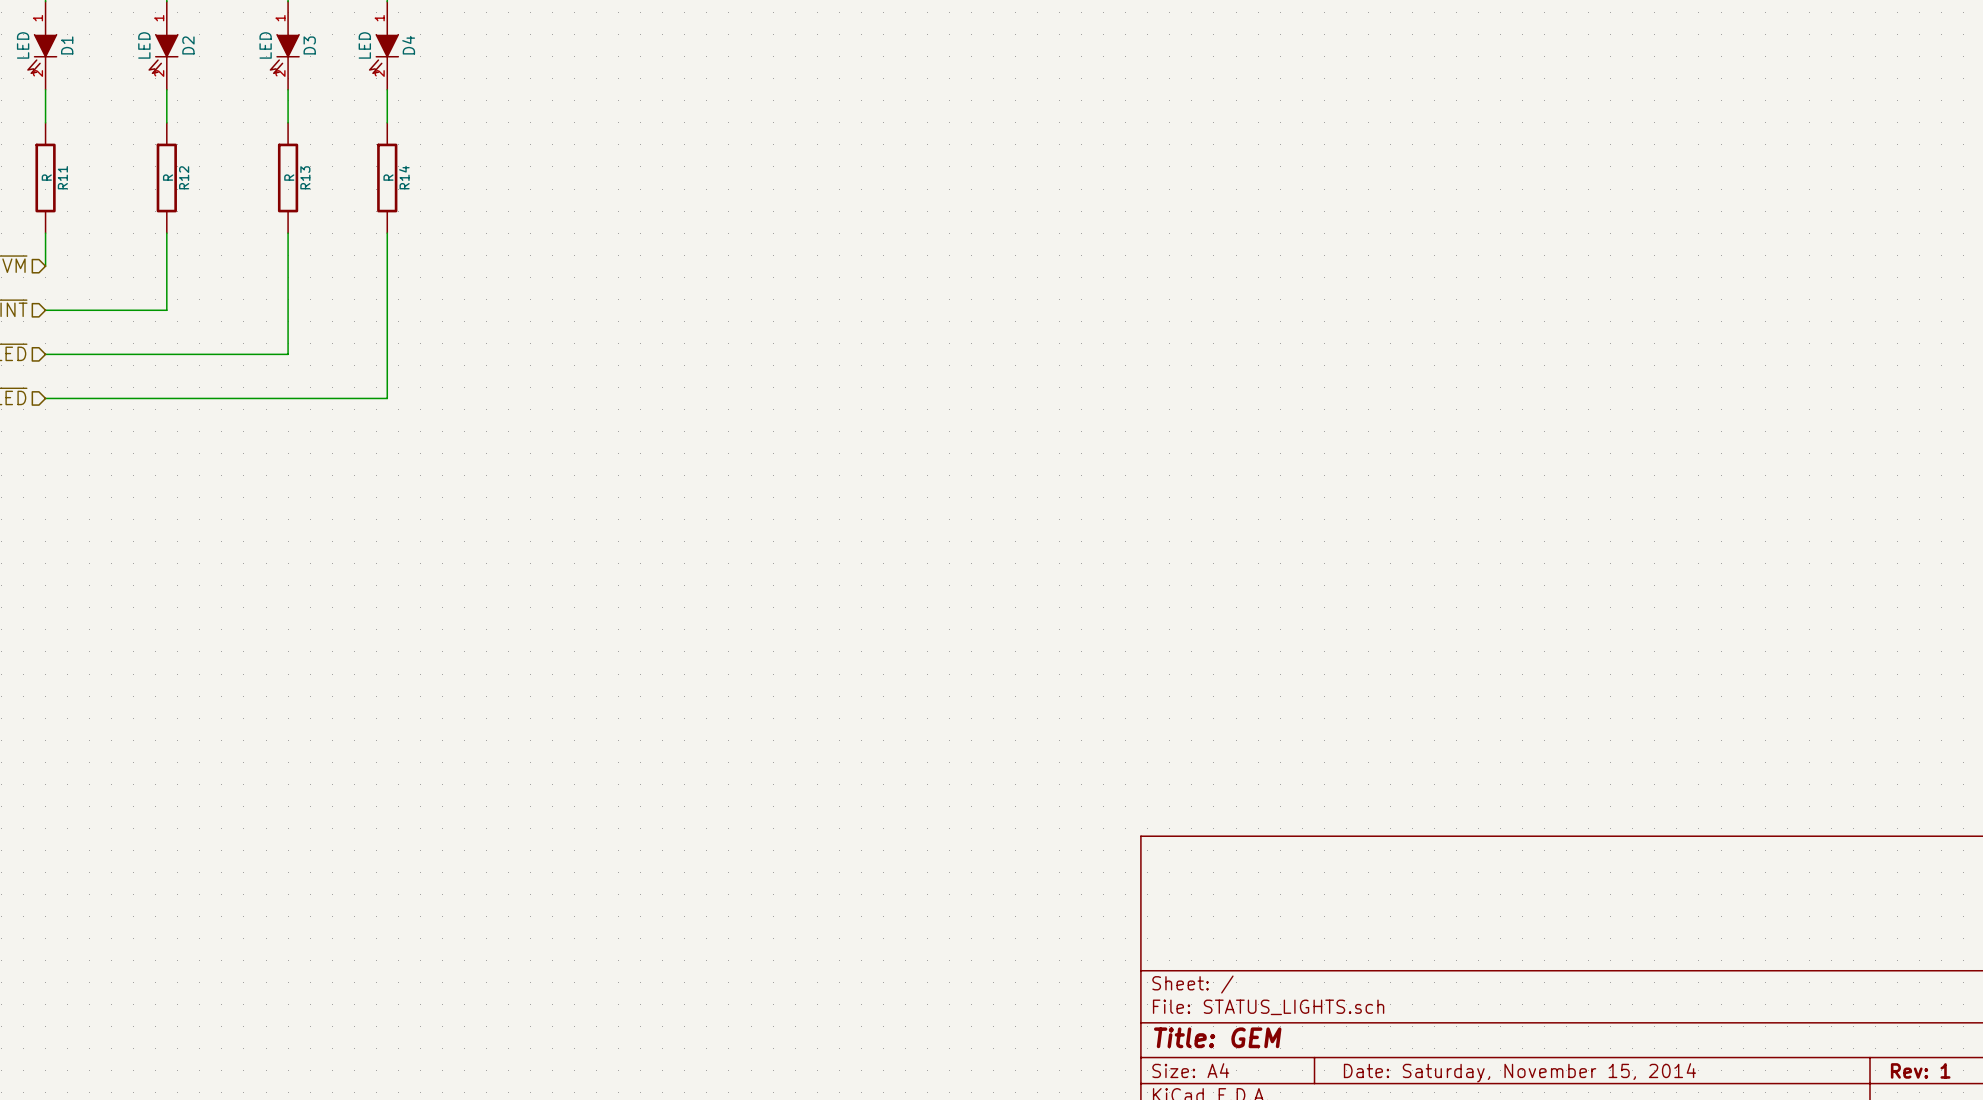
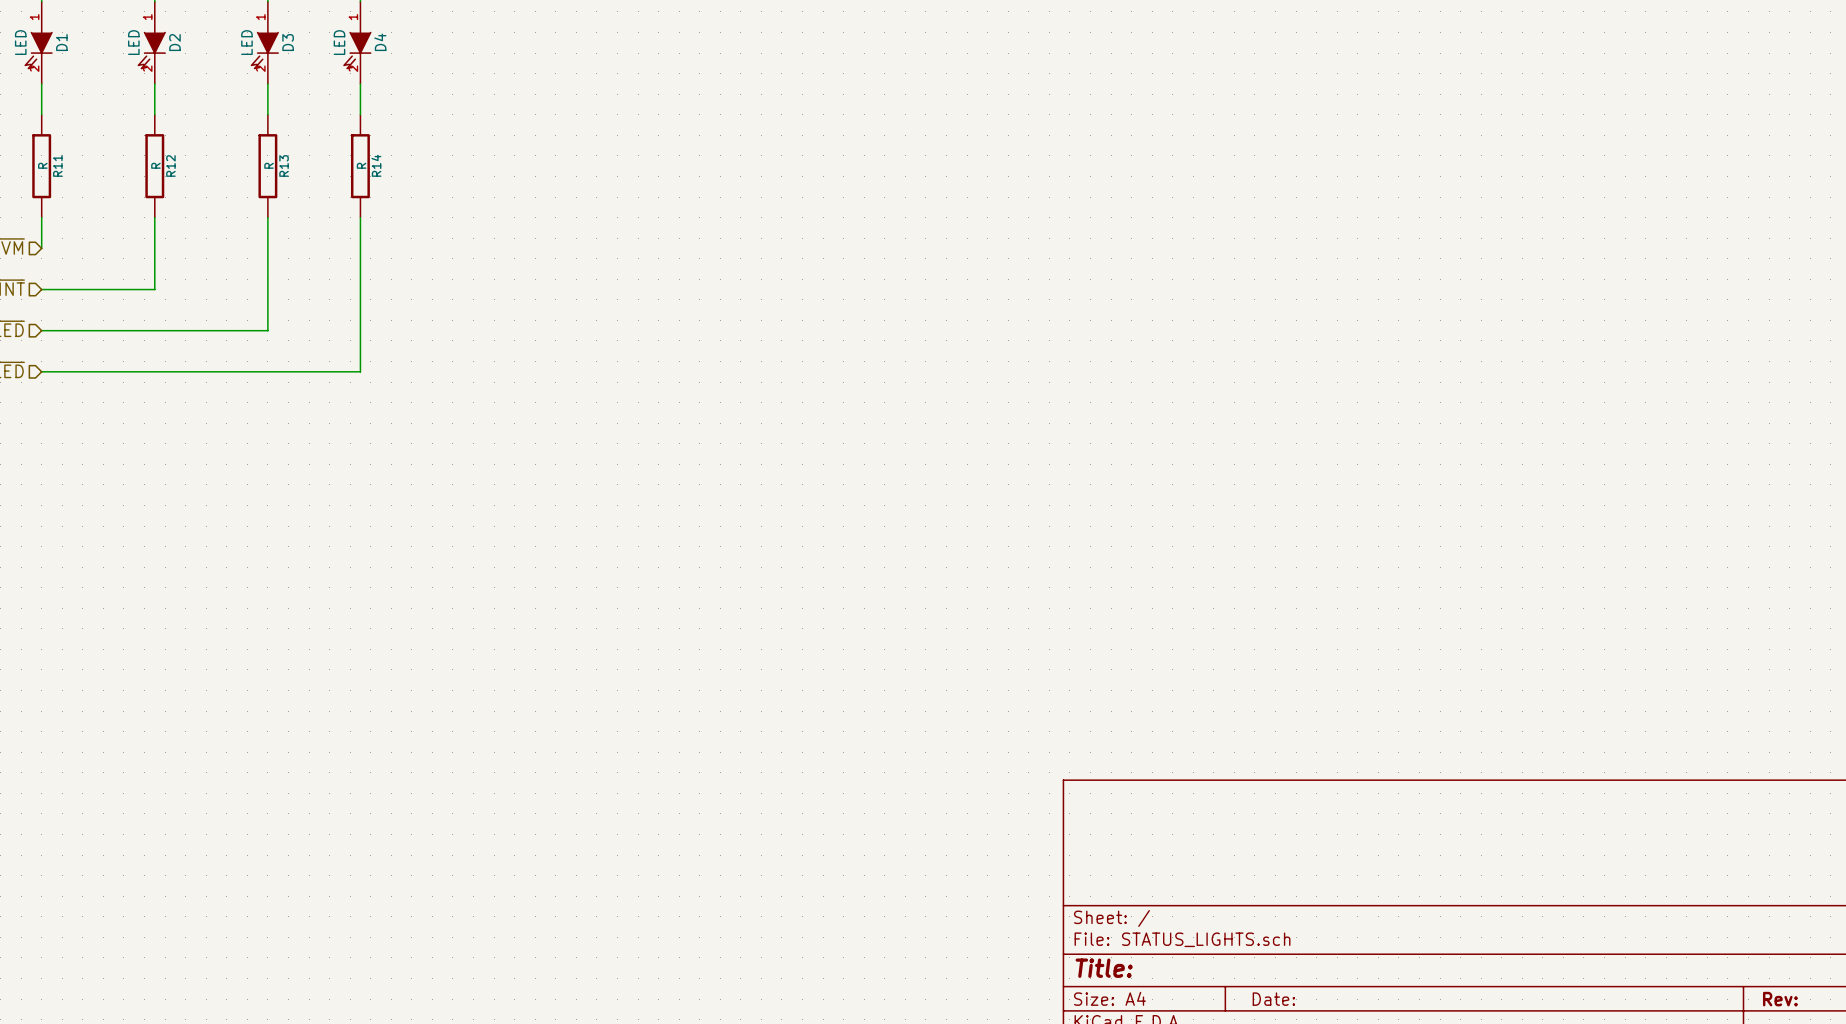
title block: Title: GEM (1217, 1037) -> Title: (1104, 968)
title block: Rev: 1 (1920, 1070) -> Rev: (1780, 999)
title block: Date: Saturday, November 15, 2014 (1519, 1072) -> Date: (1273, 999)

